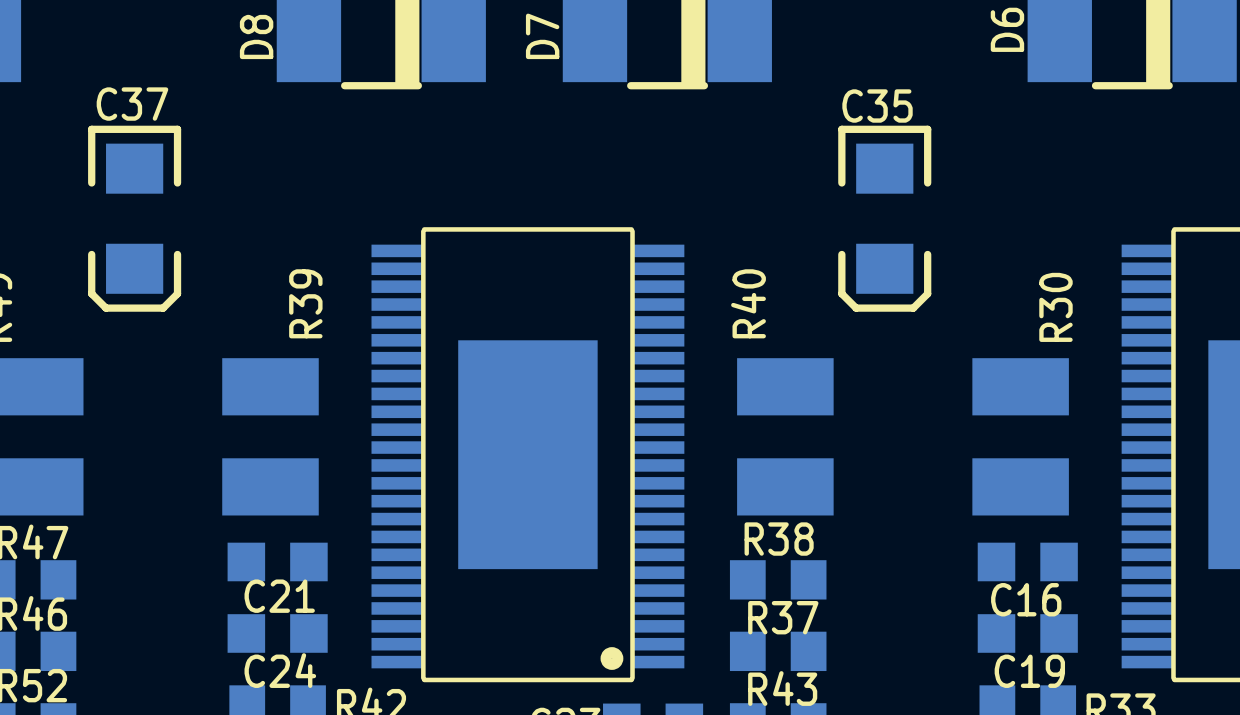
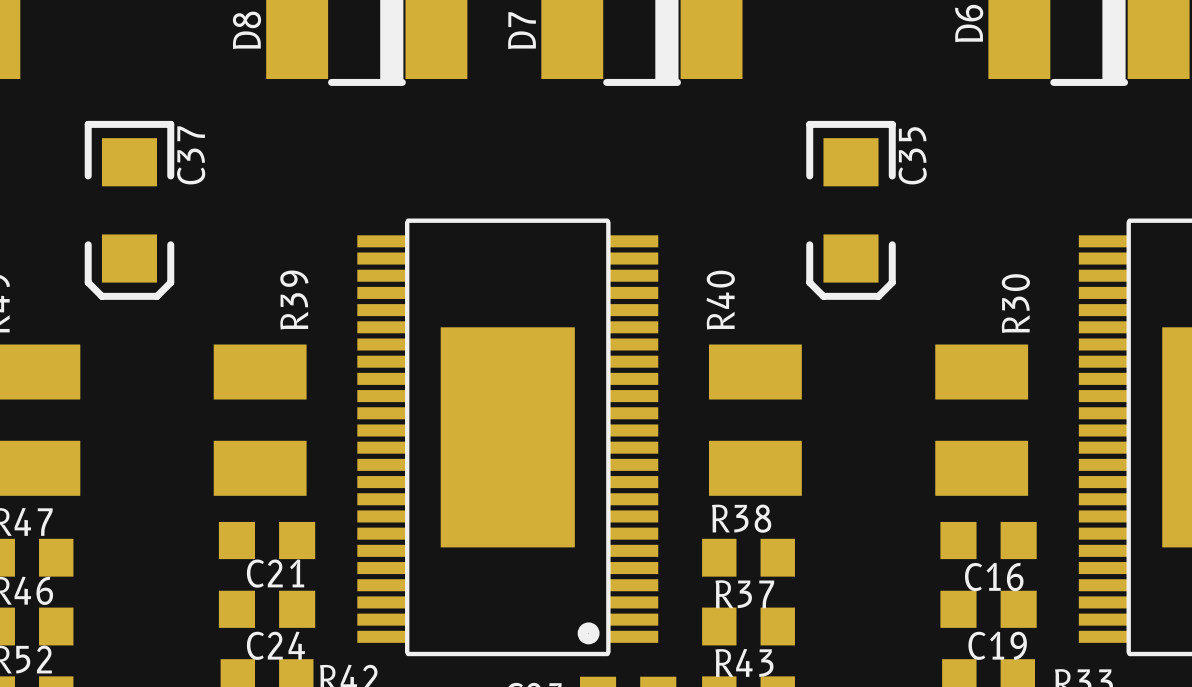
C37 name rotation: 0° (132, 104) -> 90° counterclockwise (191, 155)
C37 name position: C37 (132, 104) -> C37 (191, 155)
C35 name rotation: 0° (877, 106) -> 90° counterclockwise (912, 155)
C35 name position: C35 (877, 106) -> C35 (912, 155)

